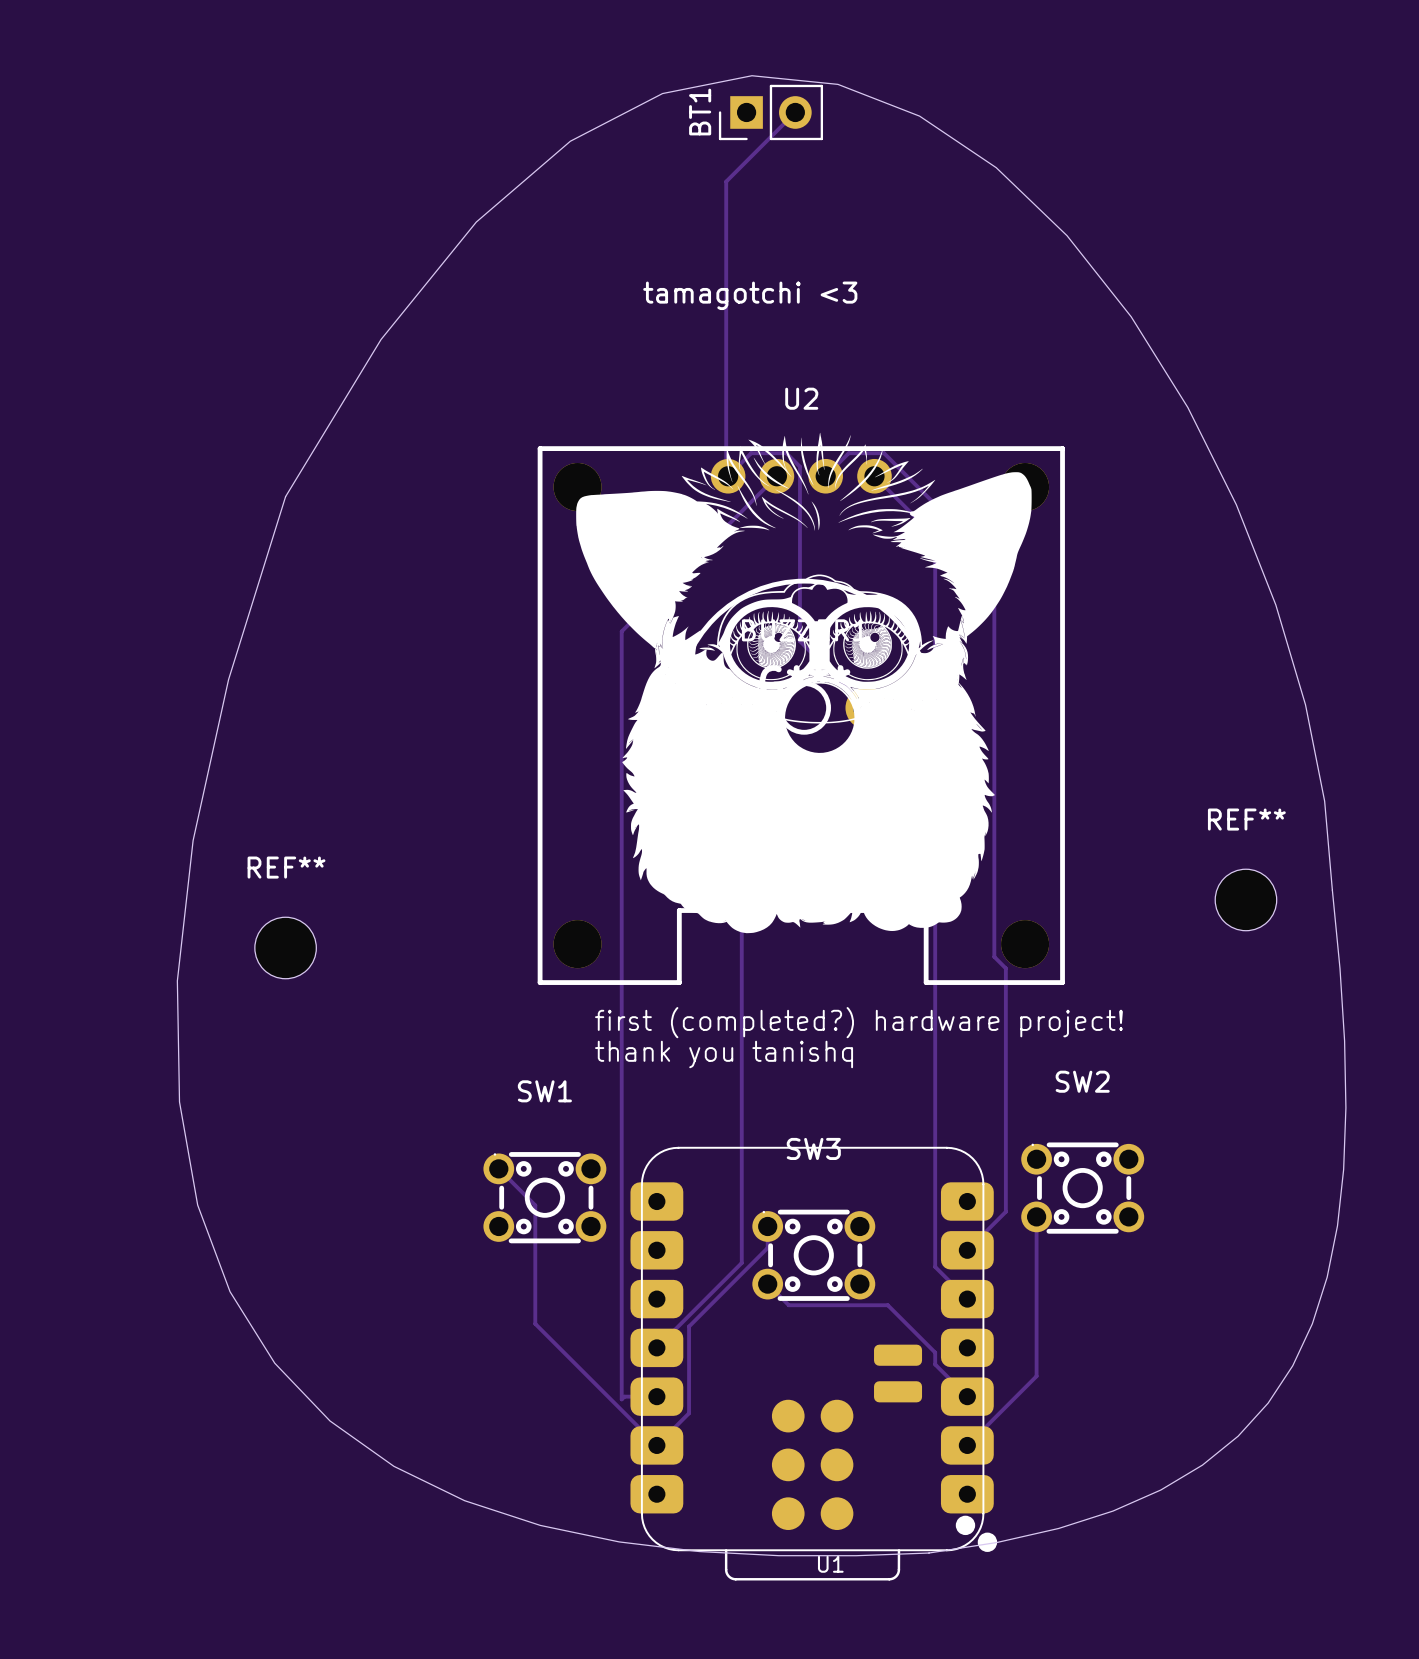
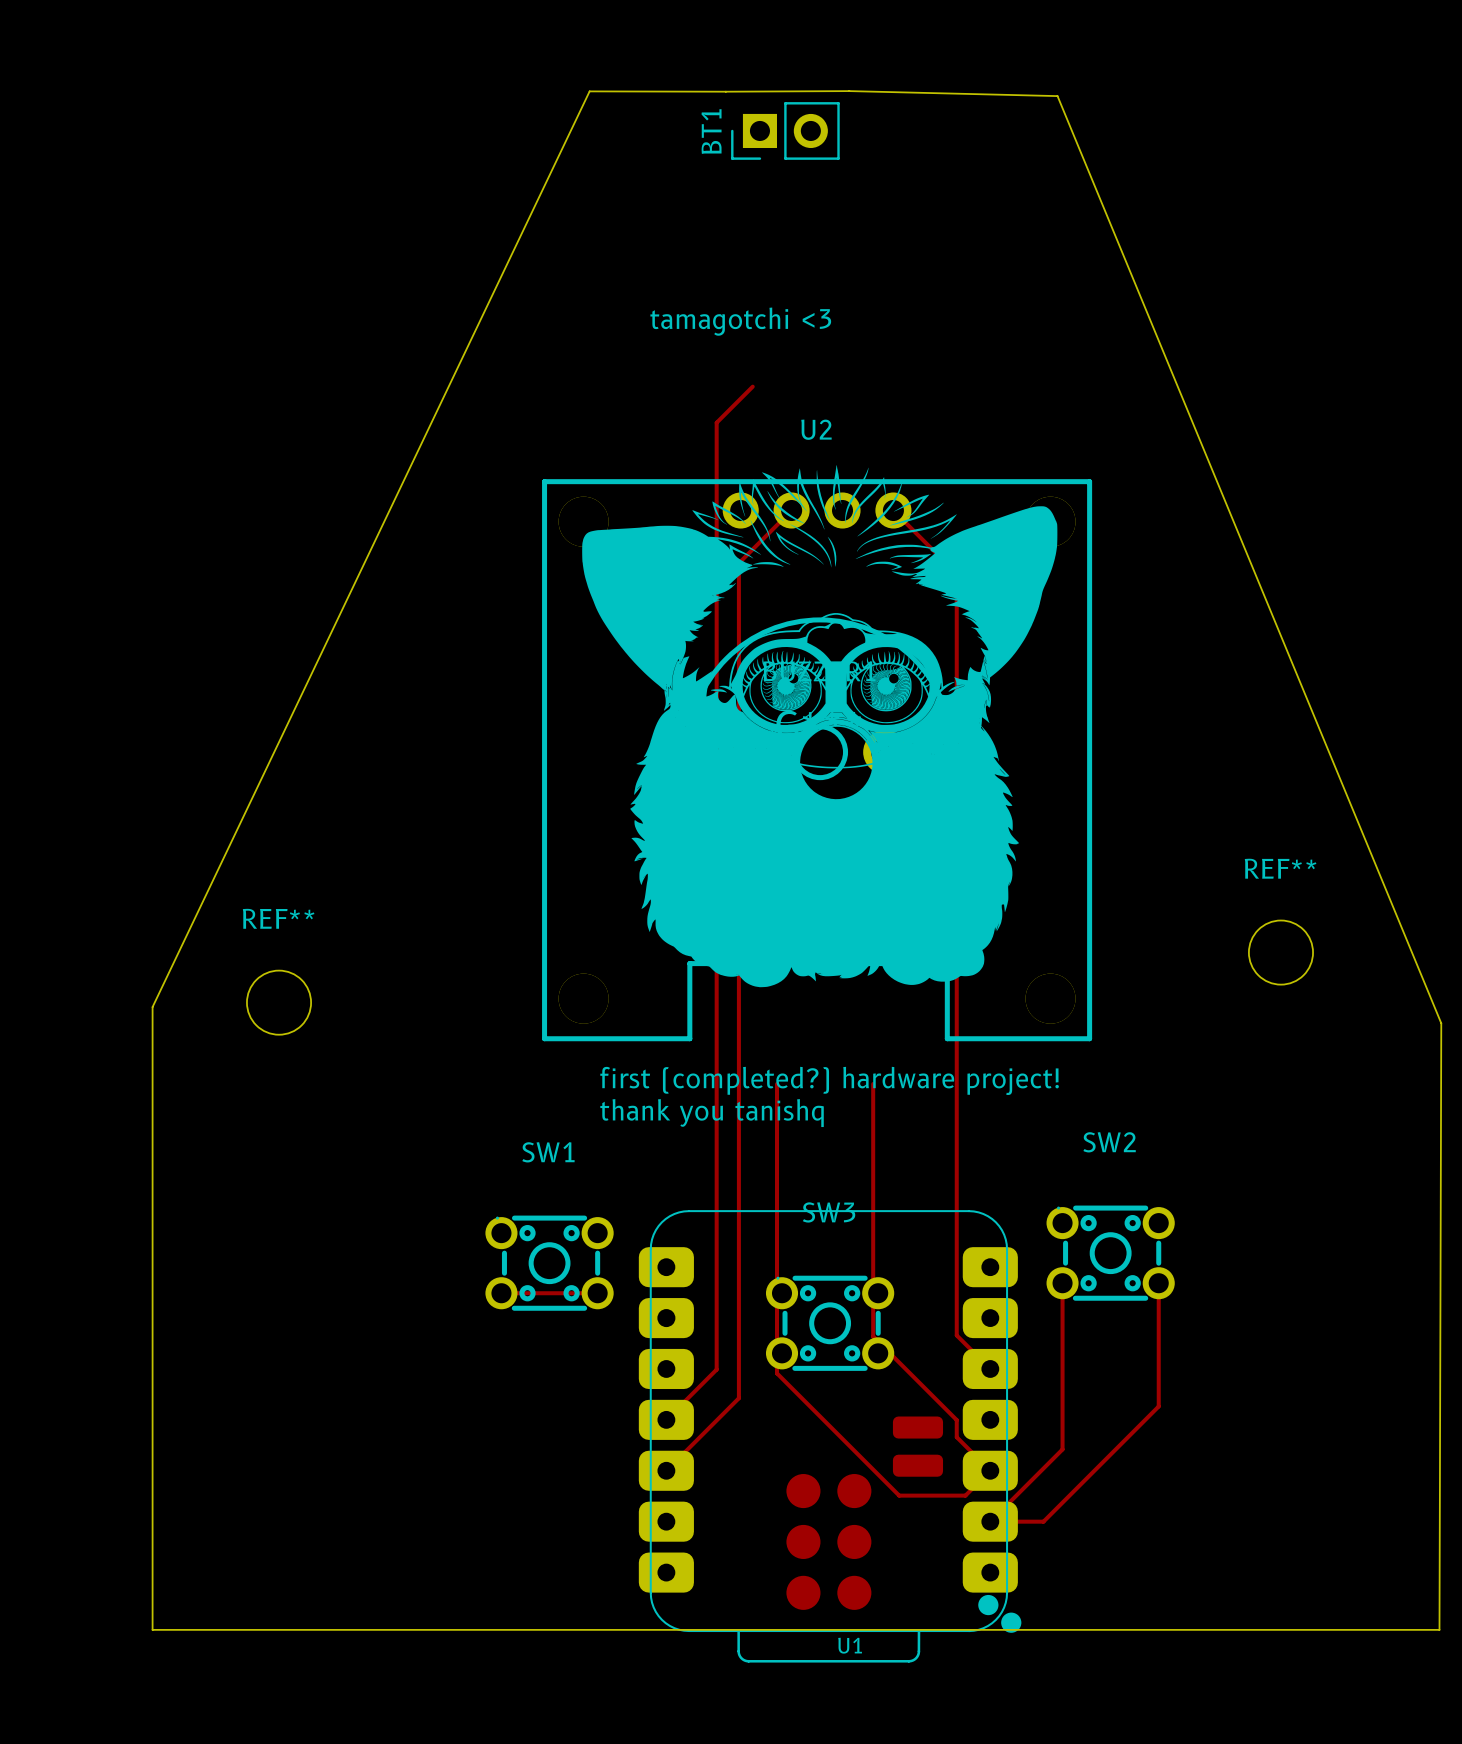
track: (795, 112) (726, 181) (726, 474) -> none
track: (728, 476) (751, 453) (786, 453) (799, 466) (799, 641) (866, 707) -> none
track: (825, 476) (848, 453) (884, 453) (994, 563) (994, 956) (1005, 968) (1005, 1211) (967, 1250) -> none
board edge: (285, 496) (228, 679) (193, 840) (177, 980) (179, 1101) (197, 1205) (230, 1291) (274, 1363) (330, 1420) (393, 1466) (464, 1500) (540, 1525) (619, 1541) (699, 1551) (778, 1555) (929, 1553) (997, 1542) (1058, 1528) (1113, 1511) (1160, 1489) (1202, 1465) (1238, 1436) (1268, 1403) (1292, 1365) (1312, 1323) (1327, 1277) (1337, 1225) (1343, 1169) (1345, 1107) (1344, 1040) (1324, 801) (1305, 704) (1275, 604) (1236, 504) (1187, 407) (1131, 316) (1067, 235) (996, 167) (919, 116) (837, 84) (751, 75) (662, 93) (570, 141) (476, 222) (381, 339) (285, 496) -> (849, 91) (589, 91) (152, 1007) (152, 1629) (1439, 1629) (1441, 1023) (1057, 96) (849, 91)
track: (726, 526) (621, 631) (621, 1399) (624, 1396) (656, 1396) -> (738, 563) (738, 1398) (666, 1470)
track: (741, 707) (741, 1262) (705, 1299) -> (752, 386) (716, 422) (716, 1369)
track: none -> (776, 1084) (776, 1373) (899, 1495) (965, 1495) (990, 1470)
track: (498, 1168) (535, 1205) (535, 1323) (656, 1445) (689, 1413) (689, 1326) (767, 1247) (767, 1226) -> none
track: none -> (1158, 1283) (1158, 1406) (1043, 1521) (990, 1521)
track: none -> (501, 1293) (597, 1293)
track: (767, 1284) (788, 1305) (887, 1305) (935, 1352) -> (873, 1084) (873, 1336) (956, 1420) (956, 1424)

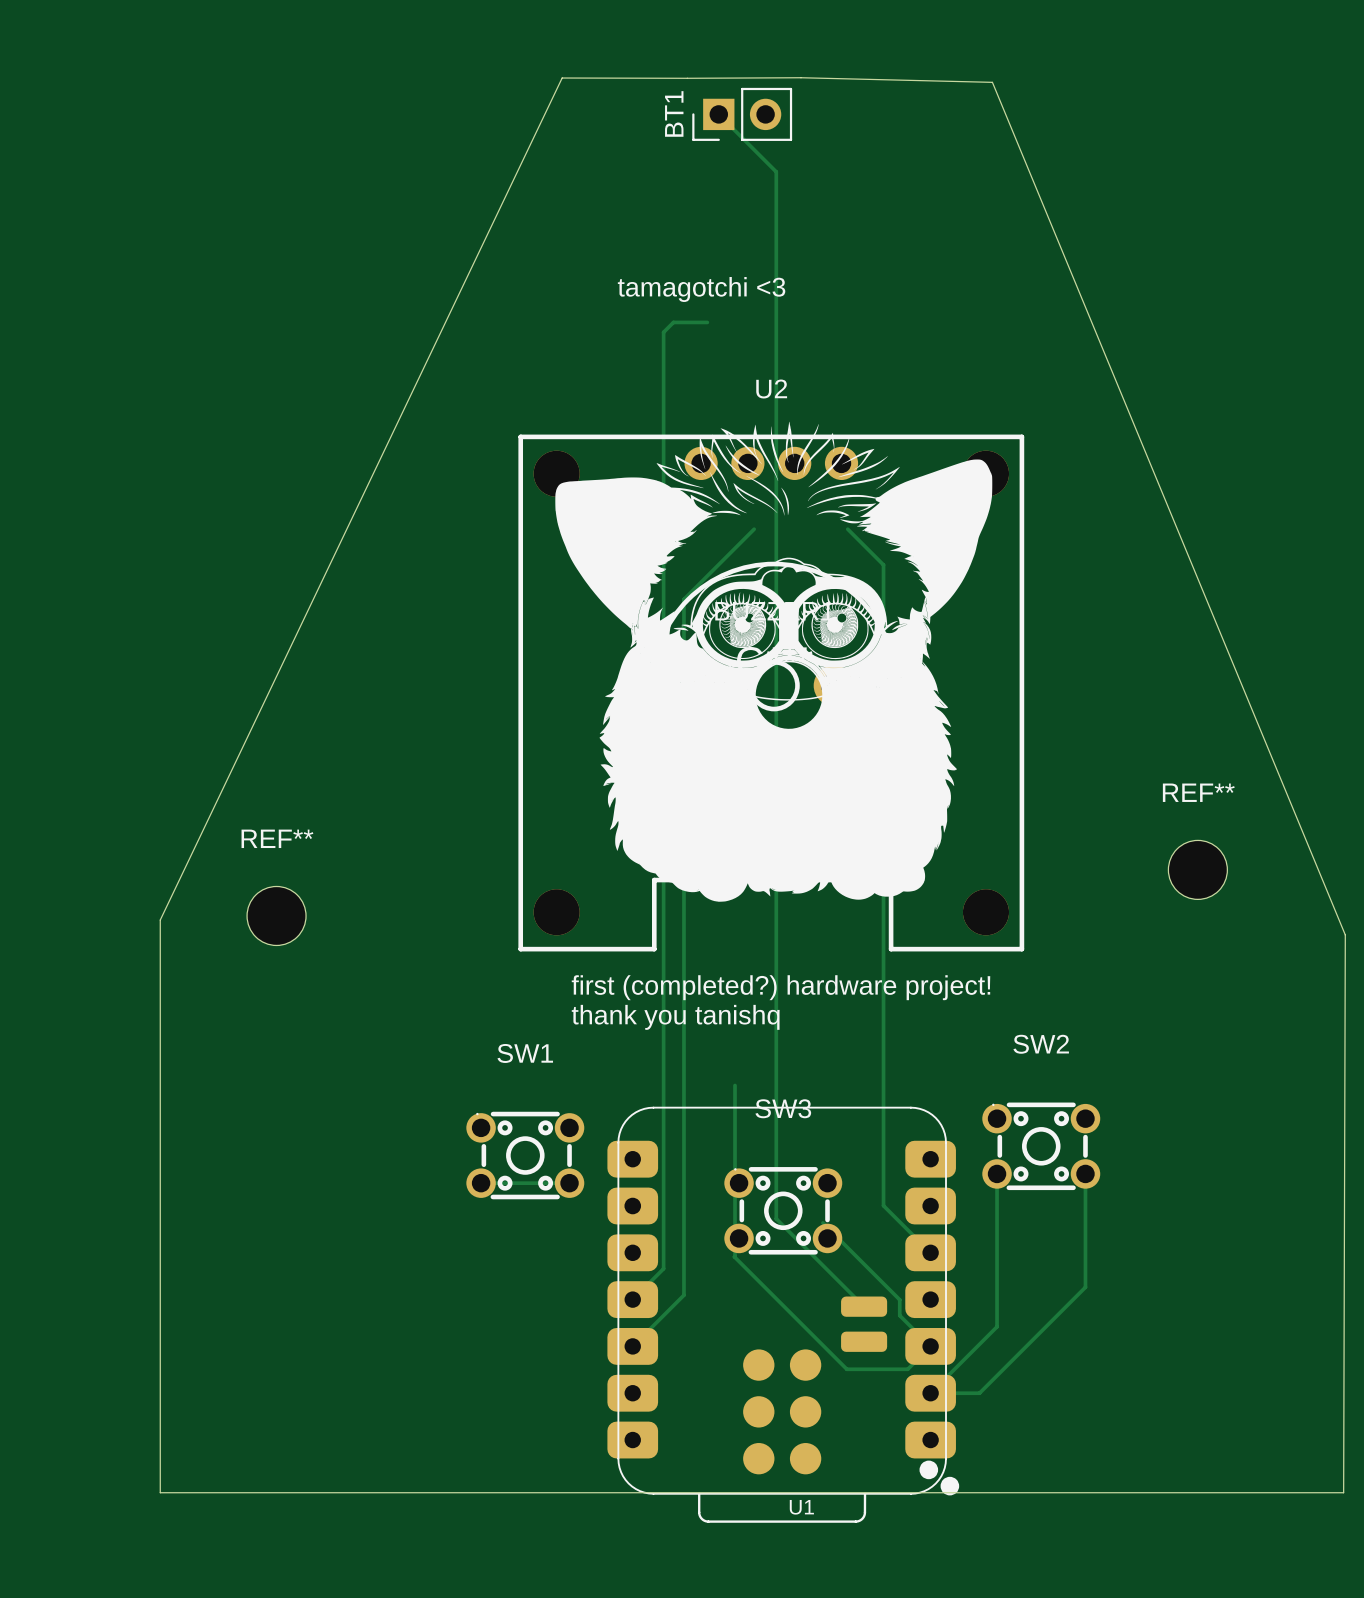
track: none -> (718, 114) (776, 171) (776, 1218) (864, 1306)
track: (752, 386) (716, 422) (716, 1369) (699, 1386) -> (707, 322) (673, 322) (663, 332) (663, 1268)
track: (791, 510) (738, 563) (738, 1398) (722, 1415) -> (754, 529) (683, 599) (683, 1295)
track: (893, 510) (956, 573) (956, 1335) -> (847, 529) (883, 564) (883, 1205) (899, 1221)
track: (776, 1084) (776, 1373) -> (735, 1085) (734, 1256)
track: (873, 1084) (873, 1336) -> none

